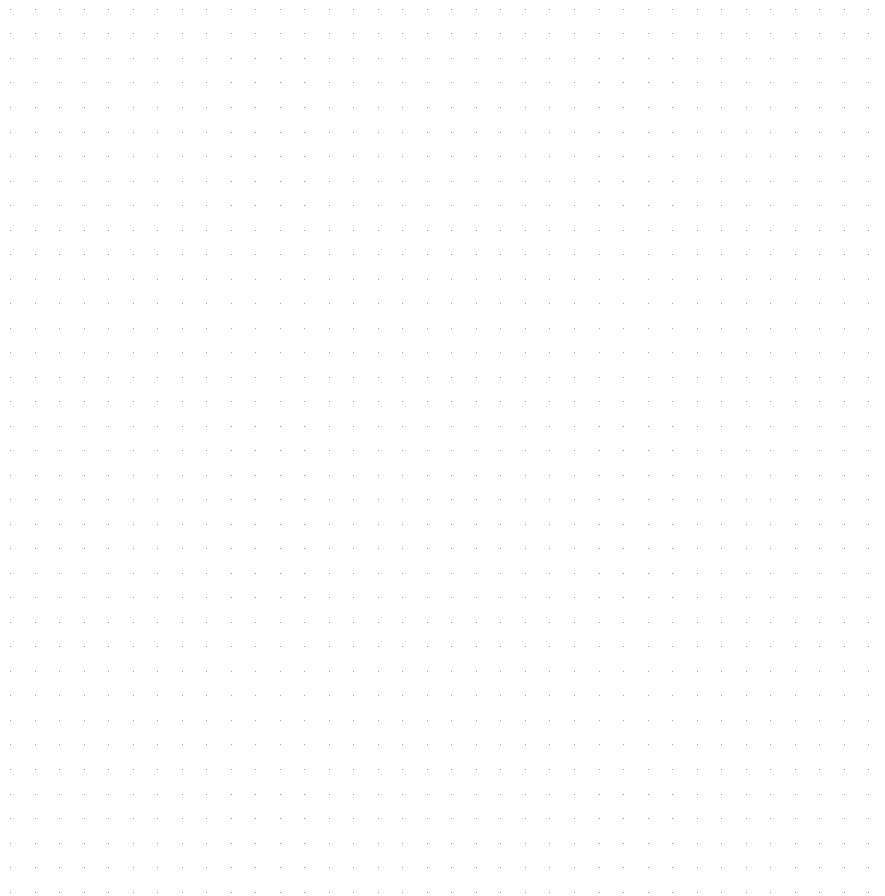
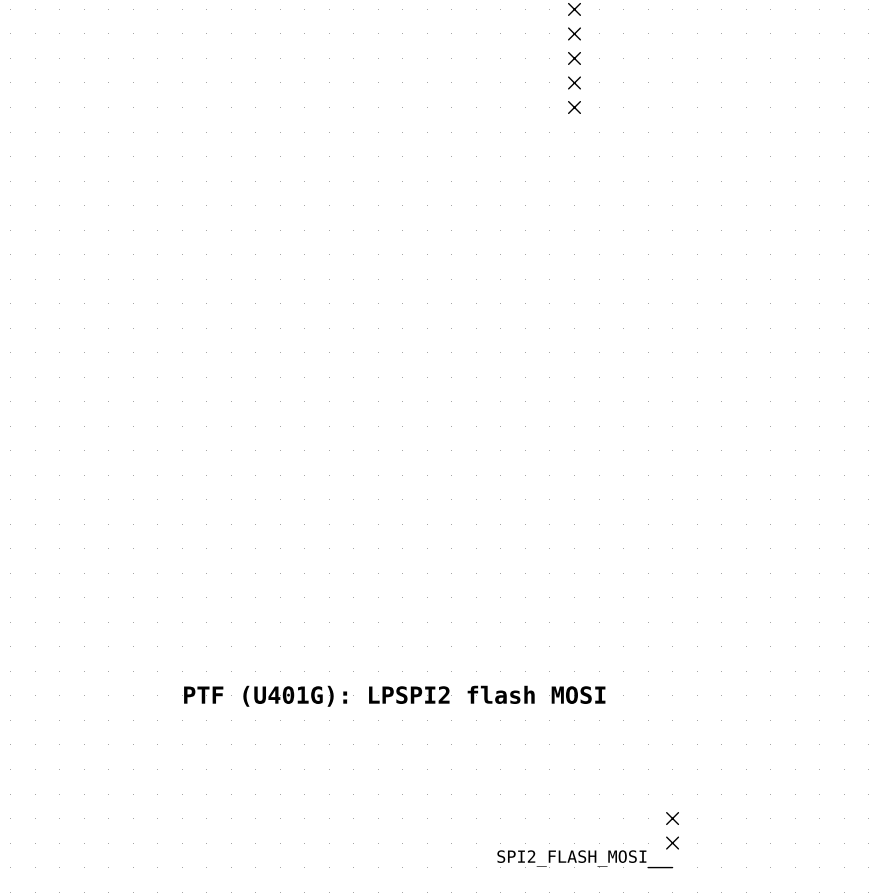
no-connect mark: none -> (574, 9)
no-connect mark: none -> (574, 33)
no-connect mark: none -> (574, 58)
no-connect mark: none -> (574, 82)
no-connect mark: none -> (574, 107)
text: none -> PTF (U401G): LPSPI2 flash MOSI (394, 696)
no-connect mark: none -> (672, 818)
no-connect mark: none -> (672, 843)
label: none -> SPI2_FLASH_MOSI (571, 858)
wire: none -> (648, 867) (672, 867)

